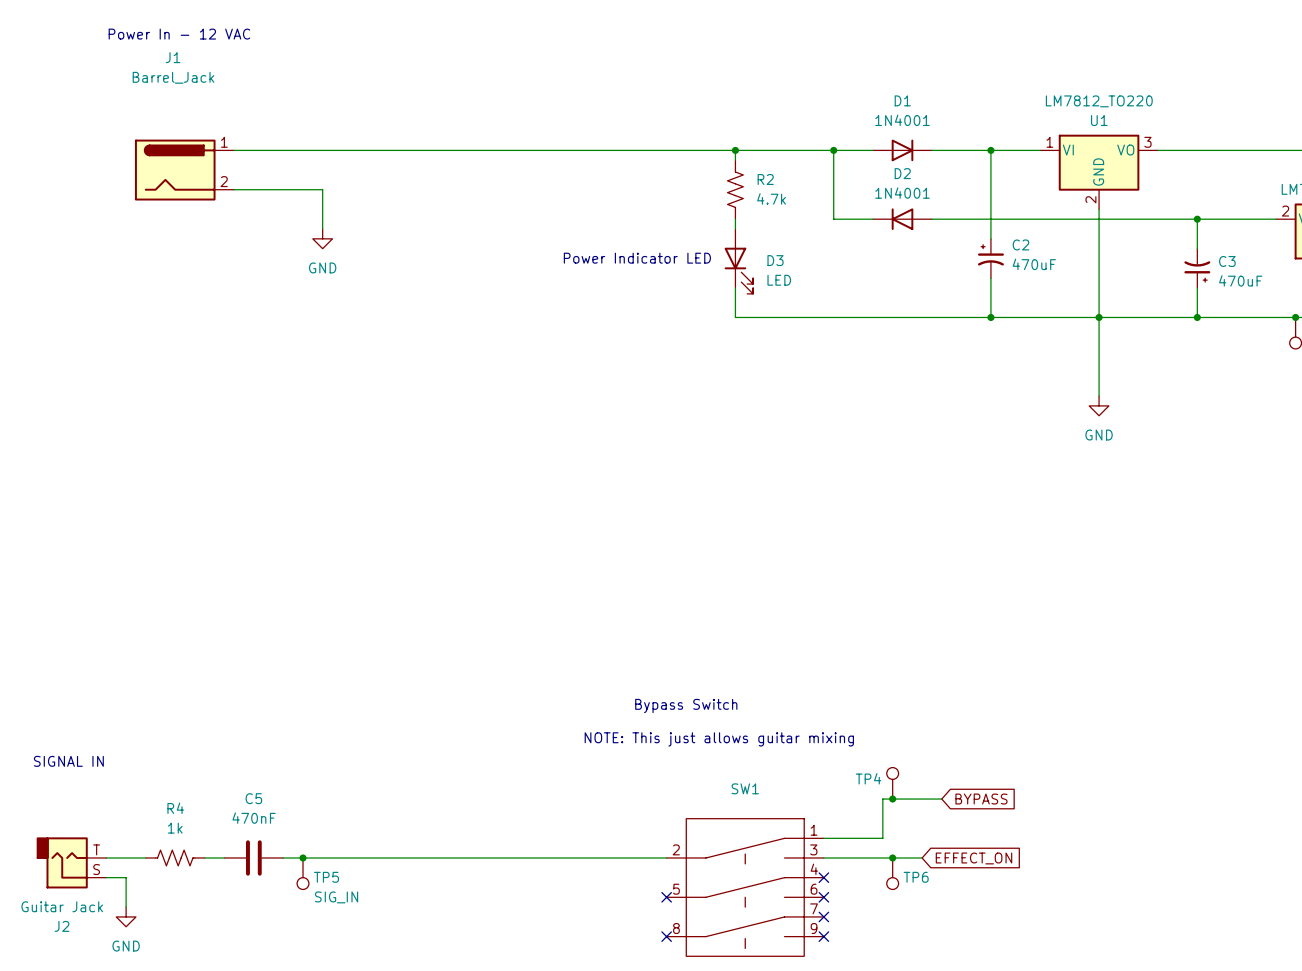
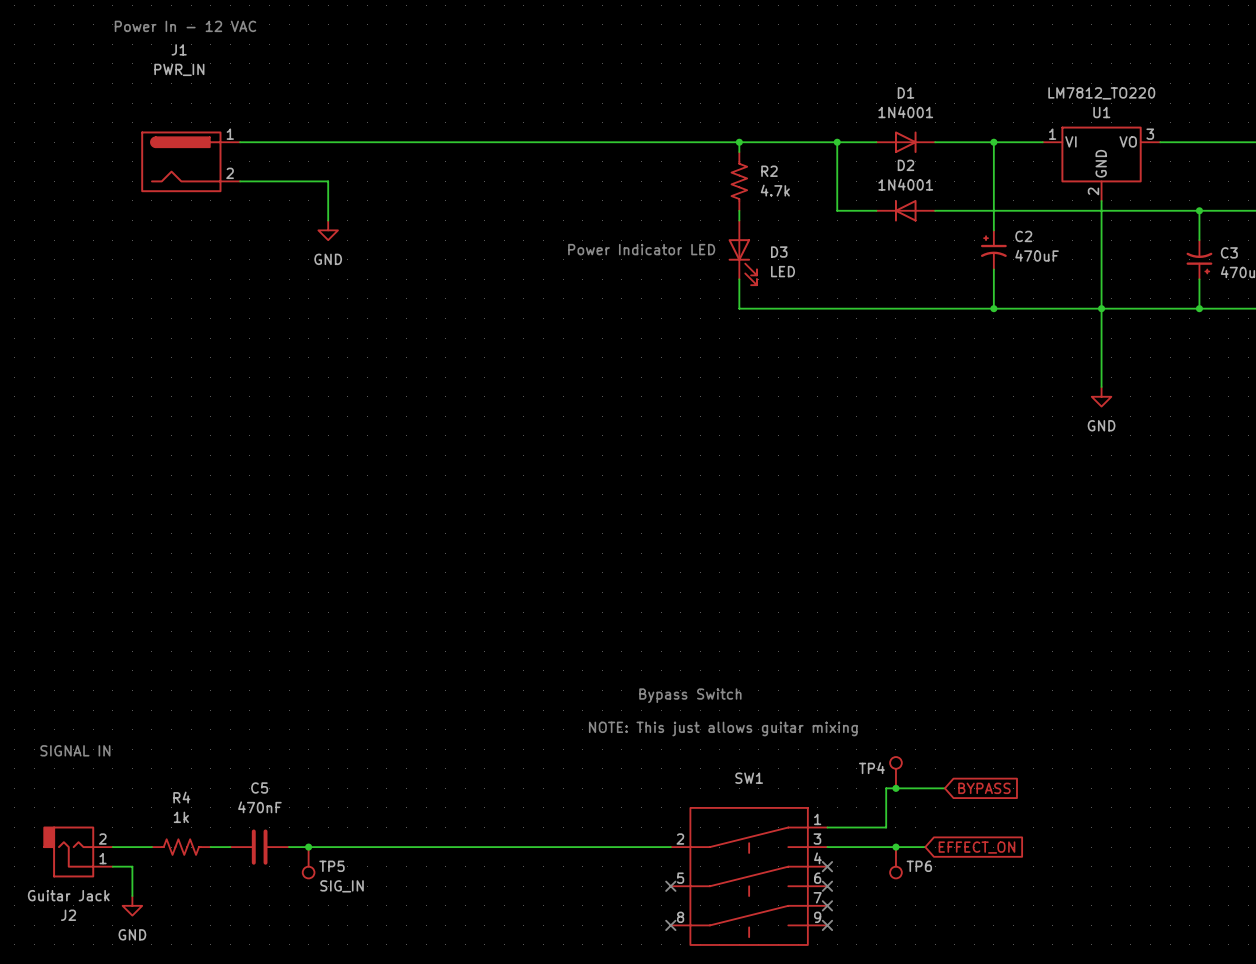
J1 value: Barrel_Jack (173, 77) -> PWR_IN (179, 69)
J2 pin number: T (96, 849) -> 2 (102, 839)
J2 pin number: S (96, 869) -> 1 (103, 858)

